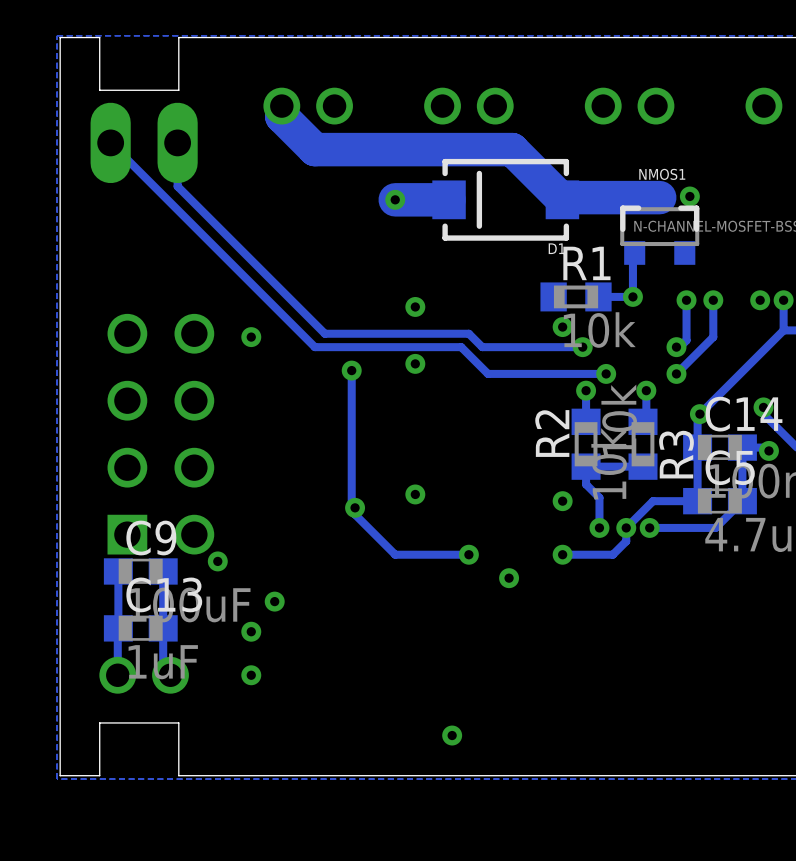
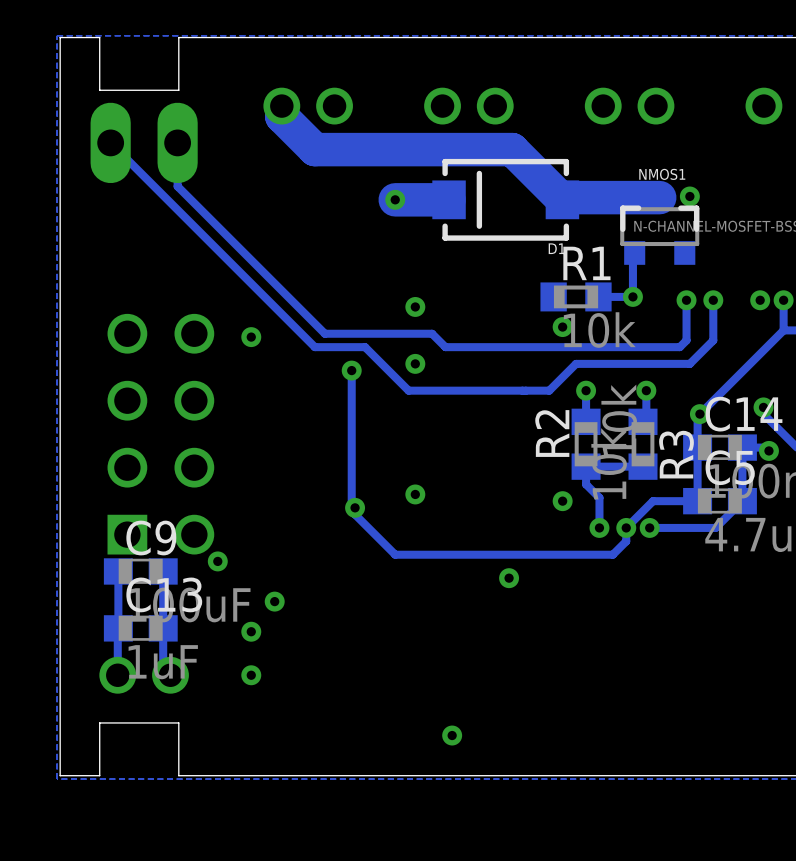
track: (432, 333) (468, 333) (482, 347) -> (461, 347) (482, 347)
track: (713, 337) (676, 373) -> (713, 337) (713, 340) (689, 363) (576, 363) (549, 390) (408, 390) (365, 347)
track: (445, 347) (365, 347) -> (445, 347) (432, 333)
track: (461, 347) (488, 373) (606, 373) -> none
via: (582, 347) -> none
track: none -> (676, 347) (582, 347)
via: (676, 347) -> none
via: (606, 373) -> none
via: (676, 373) -> none
via: (468, 554) -> none
track: none -> (562, 554) (468, 554)
via: (562, 554) -> none

